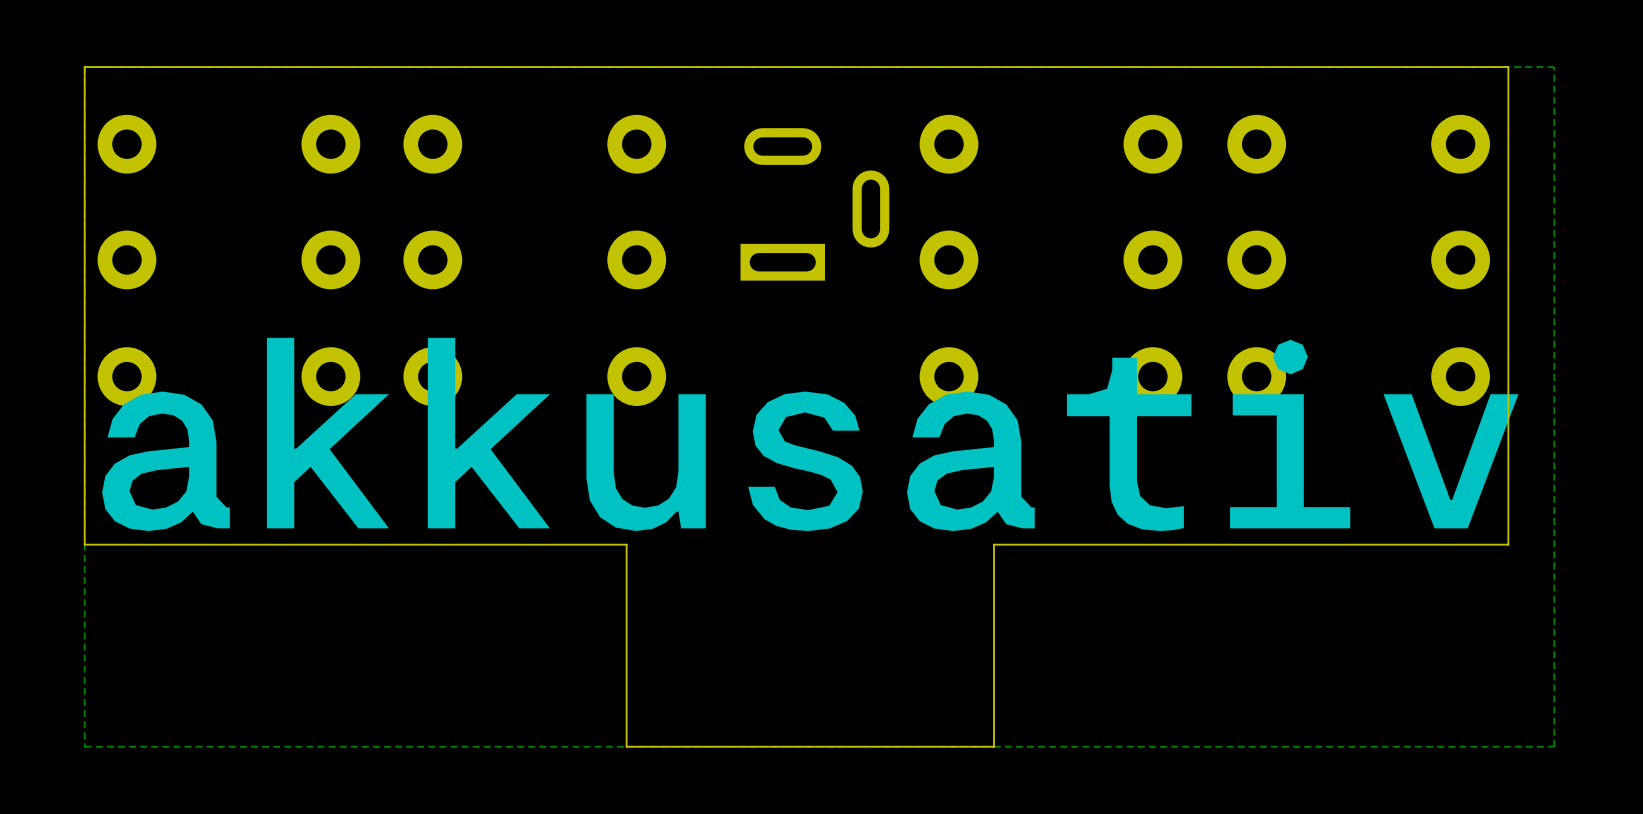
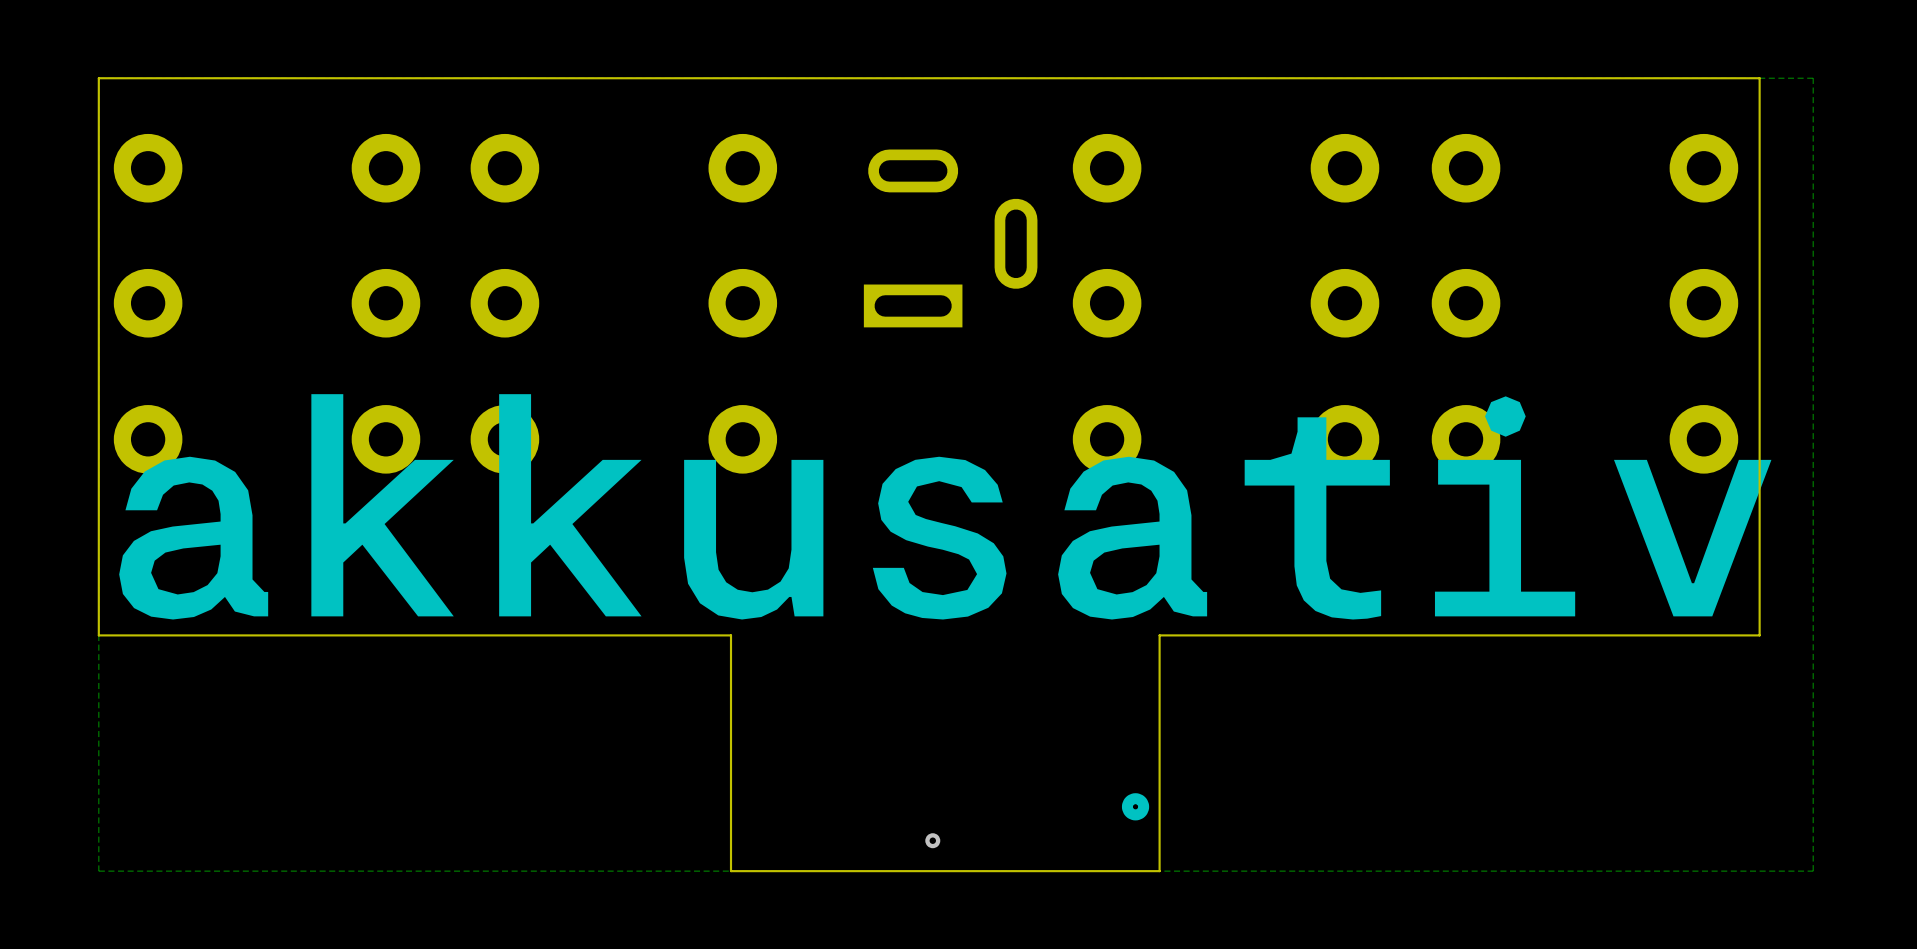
part: none -> (1135, 806)
via: none -> (932, 840)

